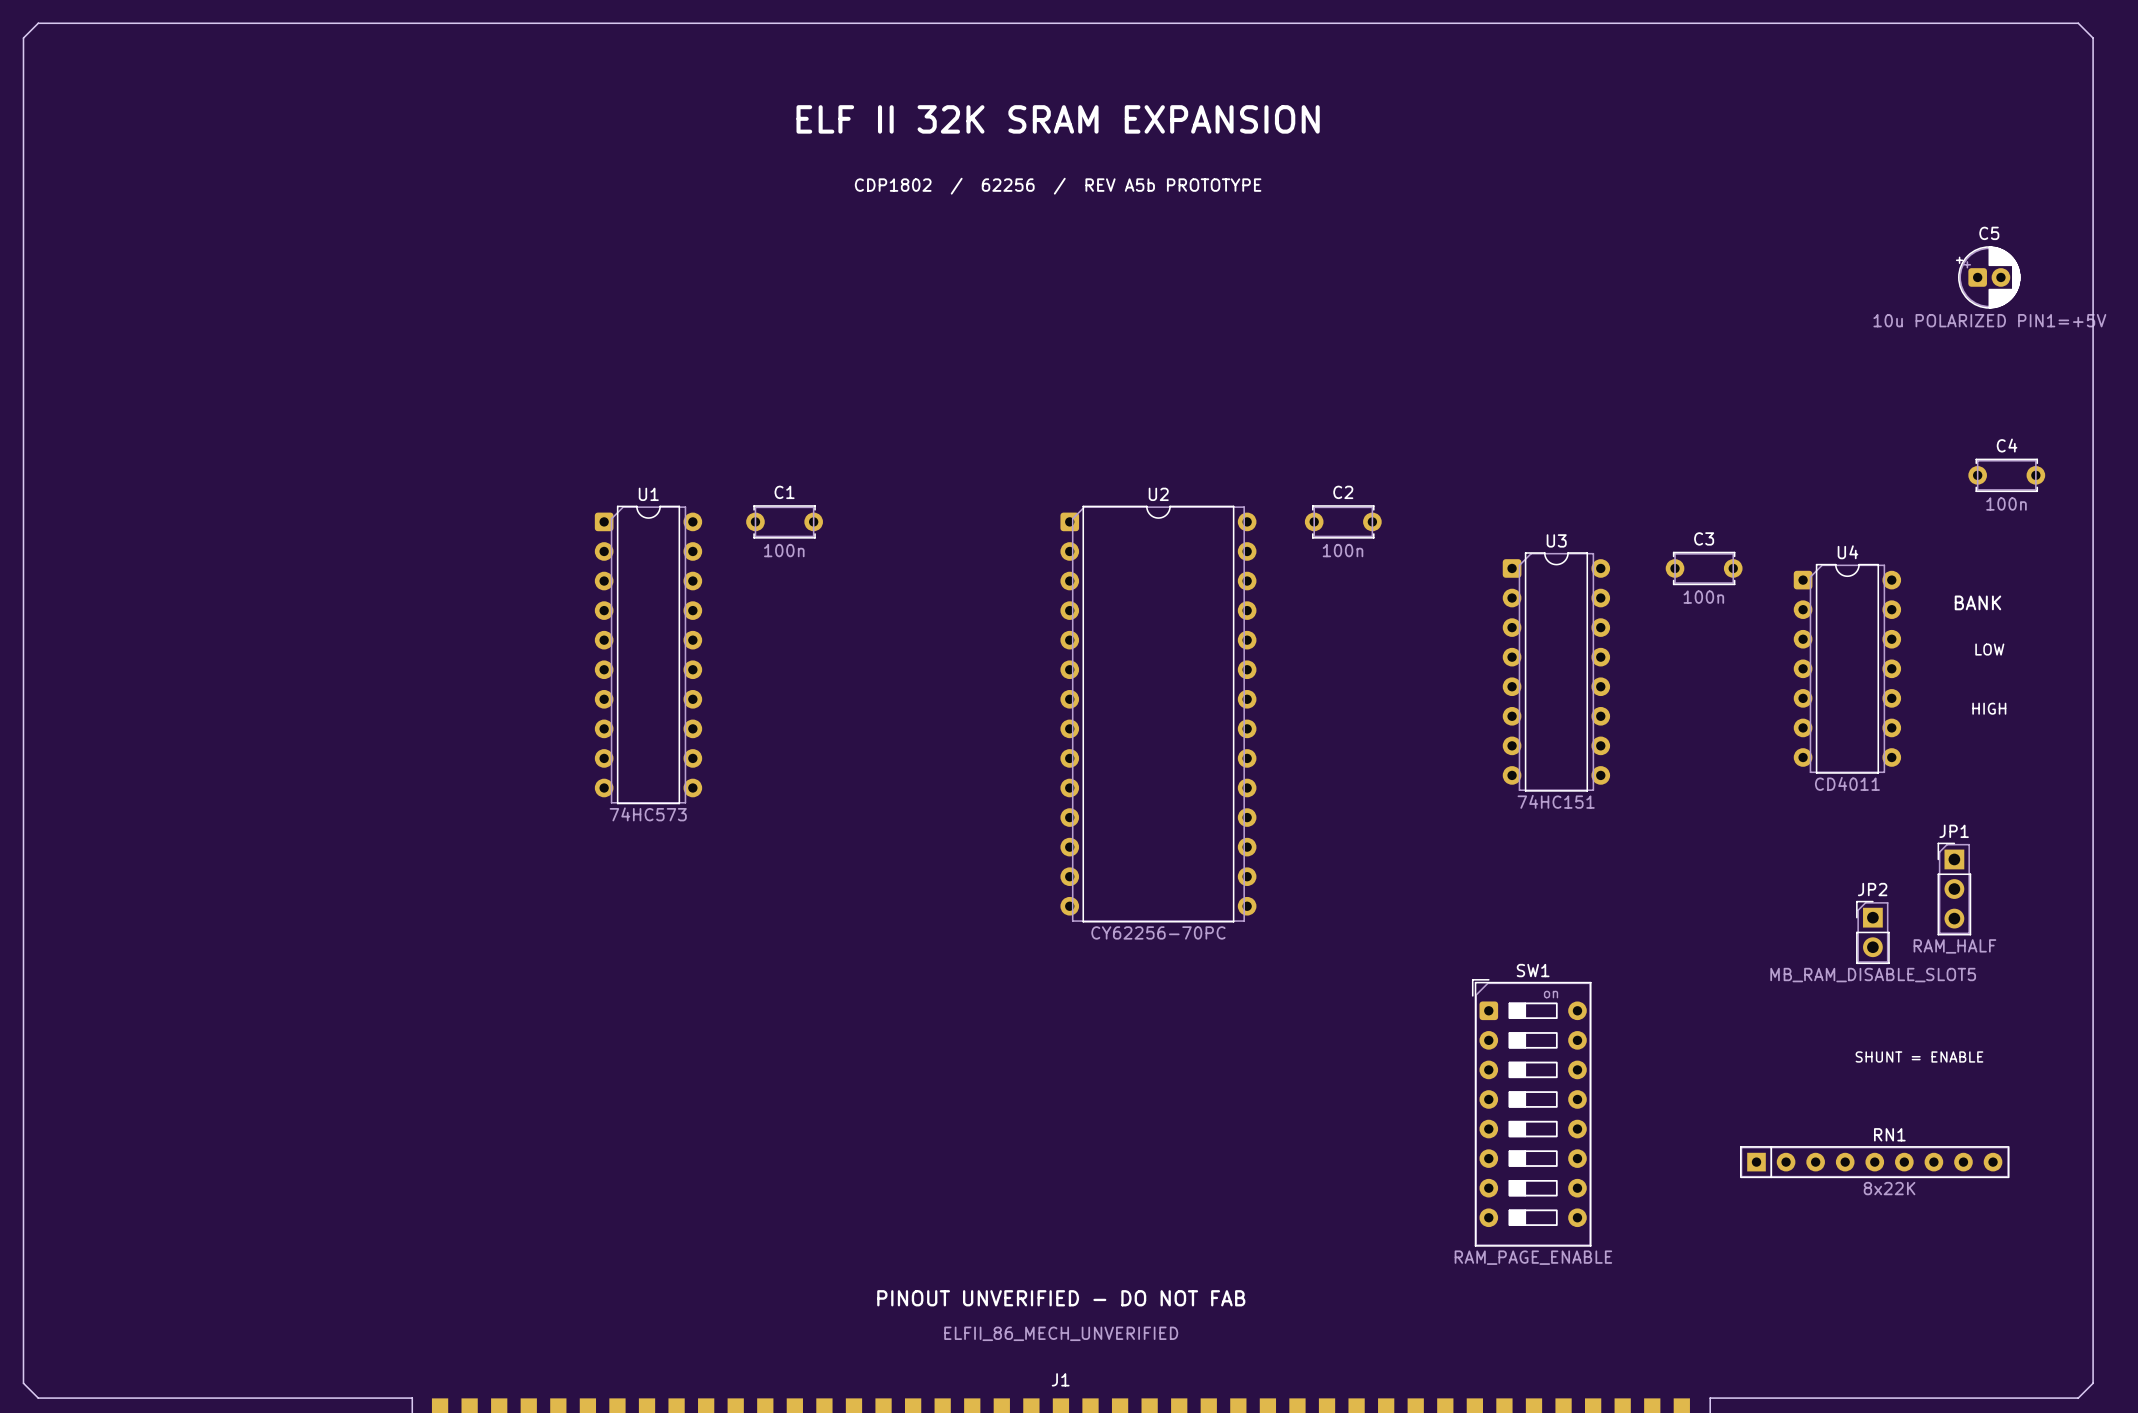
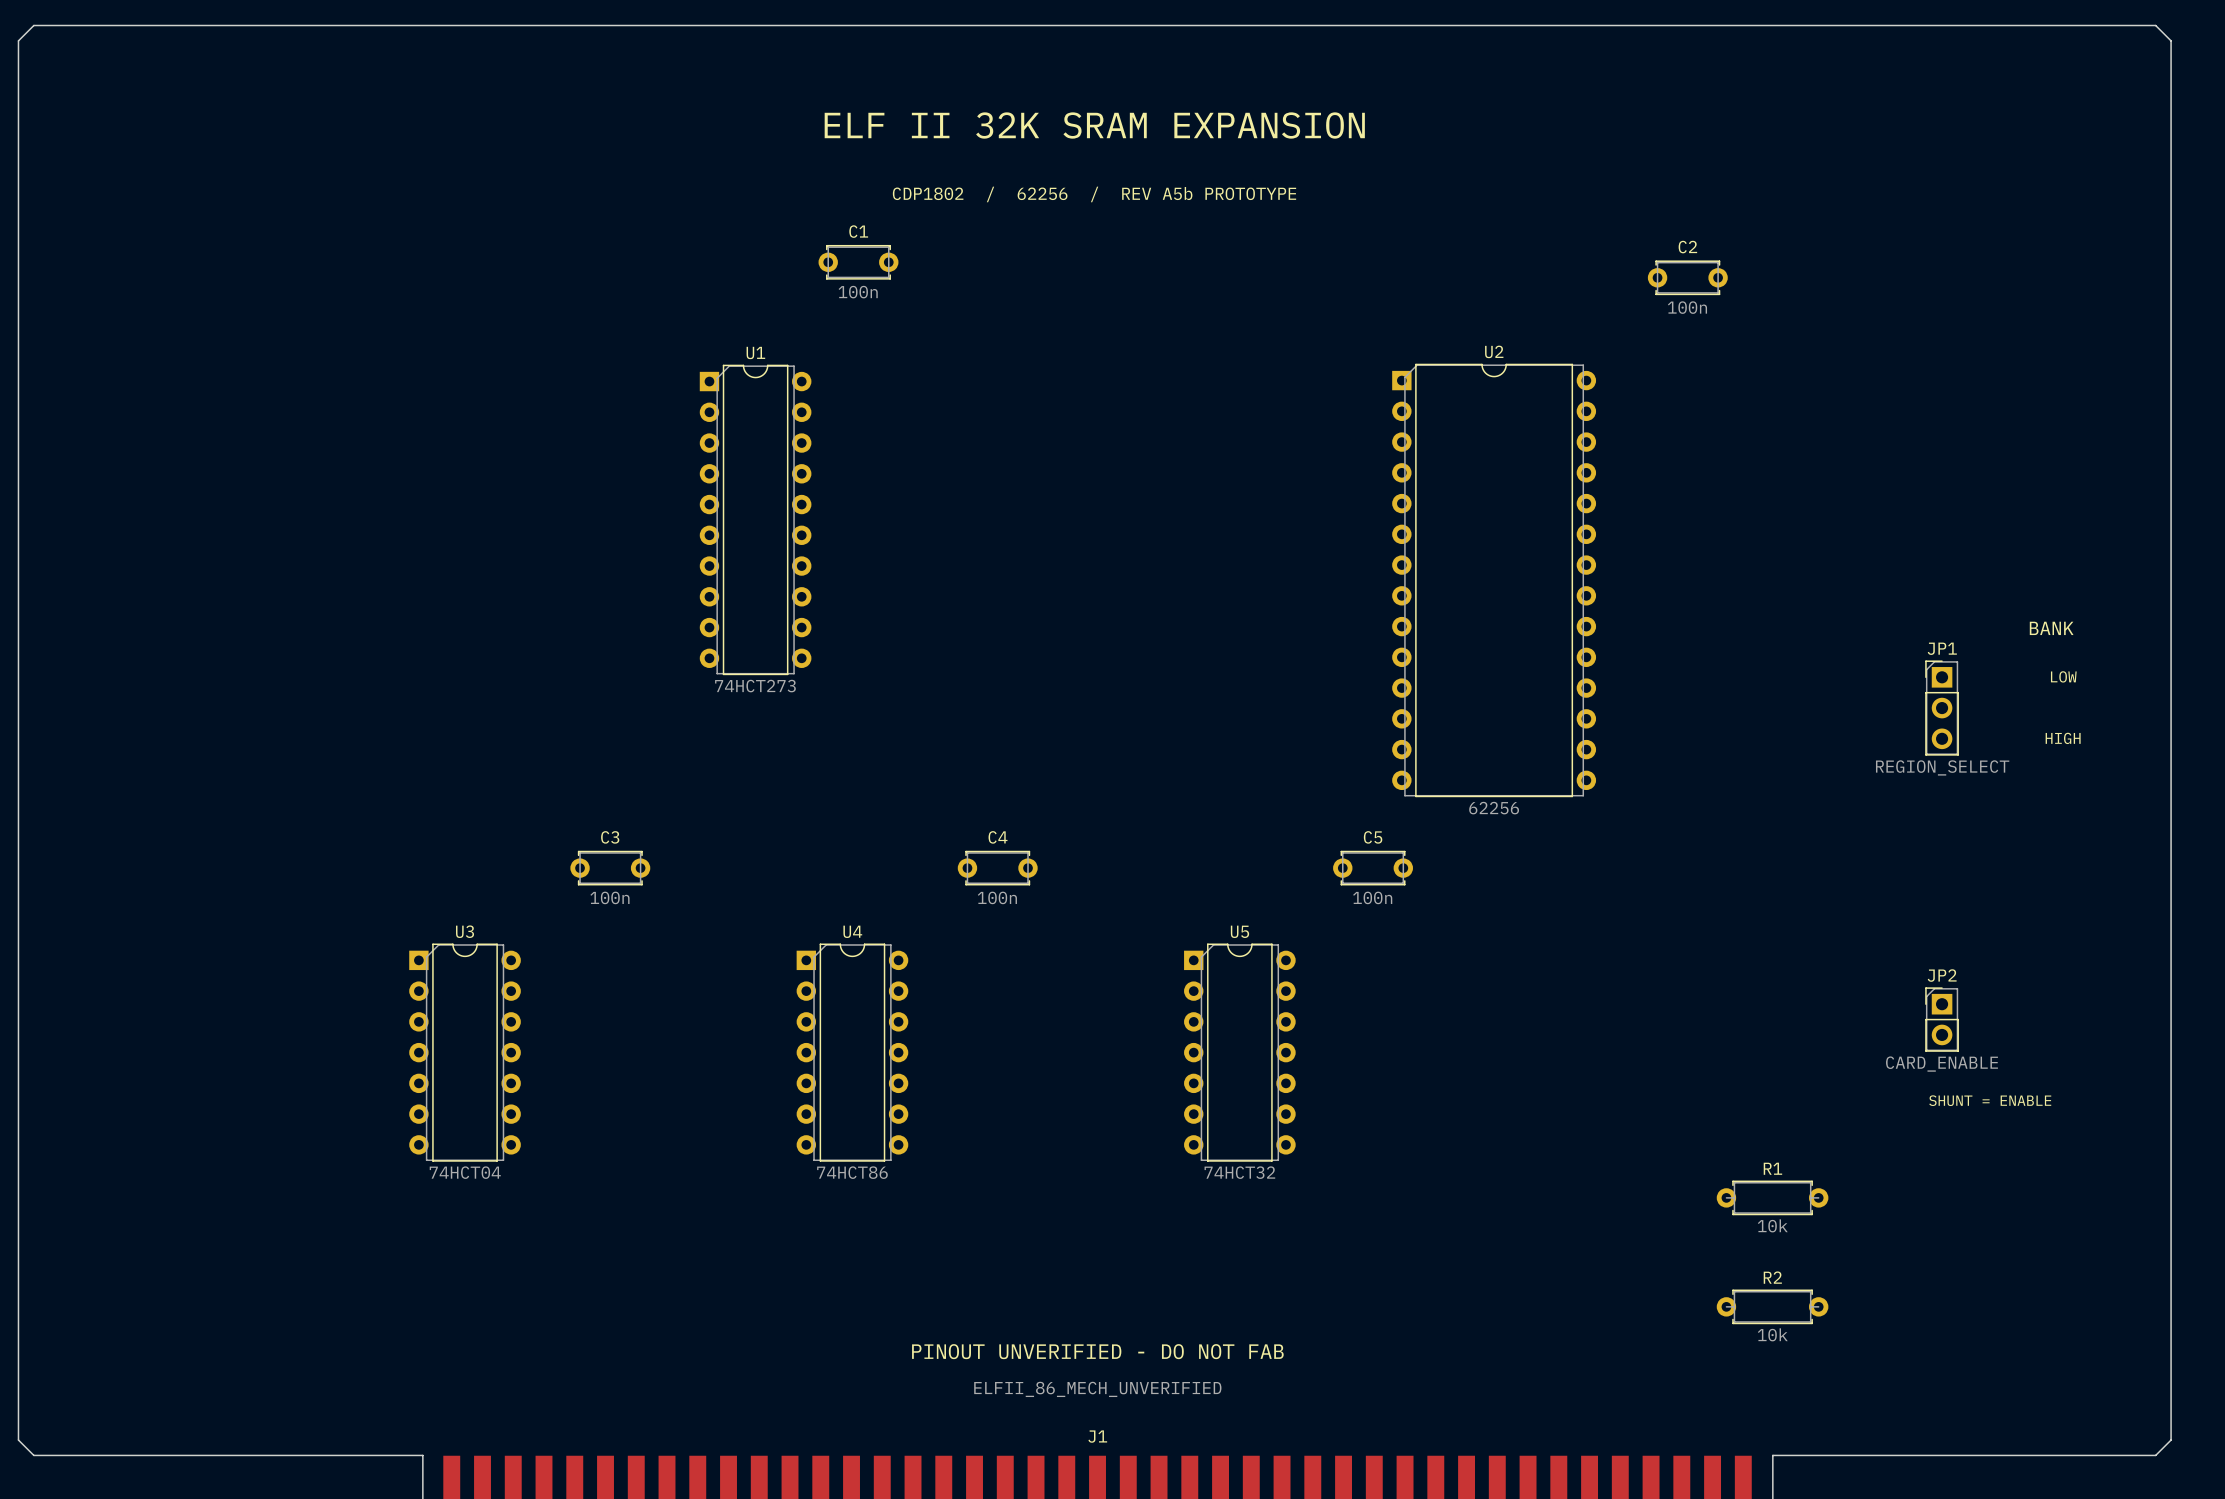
C5 footprint: [1955, 246, 2021, 309] -> [1333, 850, 1413, 886]
C5 value: 10u POLARIZED PIN1=+5V (1989, 320) -> 100n (1372, 897)
C4 footprint: [1968, 458, 2046, 492] -> [957, 850, 1038, 886]
U1 footprint: [594, 505, 703, 805] -> [699, 364, 812, 676]
C1 footprint: [746, 505, 823, 539] -> [818, 244, 899, 280]
U2 footprint: [1060, 505, 1257, 923] -> [1392, 363, 1597, 798]
C2 footprint: [1304, 505, 1382, 539] -> [1647, 260, 1728, 296]
C3 footprint: [1665, 551, 1743, 586] -> [570, 850, 651, 886]
U3 footprint: [1502, 552, 1611, 792] -> [409, 943, 521, 1162]
U4 footprint: [1793, 563, 1902, 774] -> [796, 943, 909, 1162]
U4 value: CD4011 (1847, 783) -> 74HCT86 (852, 1172)
U3 value: 74HC151 (1556, 801) -> 74HCT04 (465, 1172)
U1 value: 74HC573 (648, 814) -> 74HCT273 (755, 686)
JP1 footprint: [1937, 842, 1972, 936] -> [1925, 660, 1959, 756]
JP2 footprint: [1856, 900, 1890, 964] -> [1925, 987, 1959, 1052]
U2 value: CY62256-70PC (1158, 932) -> 62256 (1494, 808)
JP1 value: RAM_HALF (1954, 946) -> REGION_SELECT (1942, 767)
JP2 value: MB_RAM_DISABLE_SLOT5 (1873, 975) -> CARD_ENABLE (1941, 1064)
U5: none -> 74HCT32 (1239, 1052)
SW1: RAM_PAGE_ENABLE (1531, 1112) -> none
R1: none -> 10k (1772, 1197)
RN1: 8x22K (1874, 1162) -> none
R2: none -> 10k (1772, 1306)

